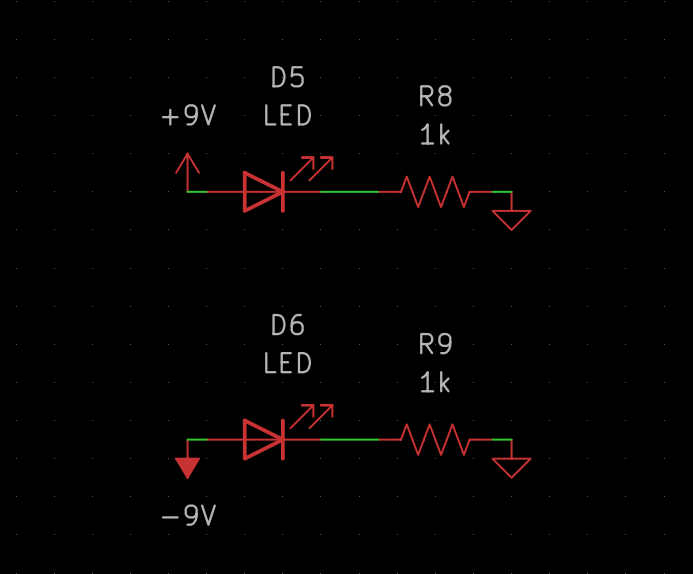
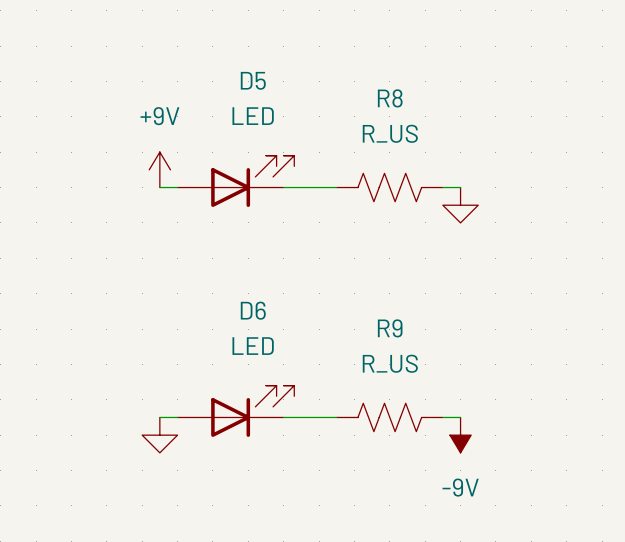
R8 value: 1k (435, 133) -> R_US (390, 133)
R9 value: 1k (435, 381) -> R_US (390, 363)
power symbol shape: [176, 439, 199, 478] -> [142, 417, 178, 453]
power symbol shape: [492, 439, 531, 478] -> [449, 417, 472, 453]
power symbol text: -9V (188, 515) -> none
power symbol text: none -> -9V (460, 487)

